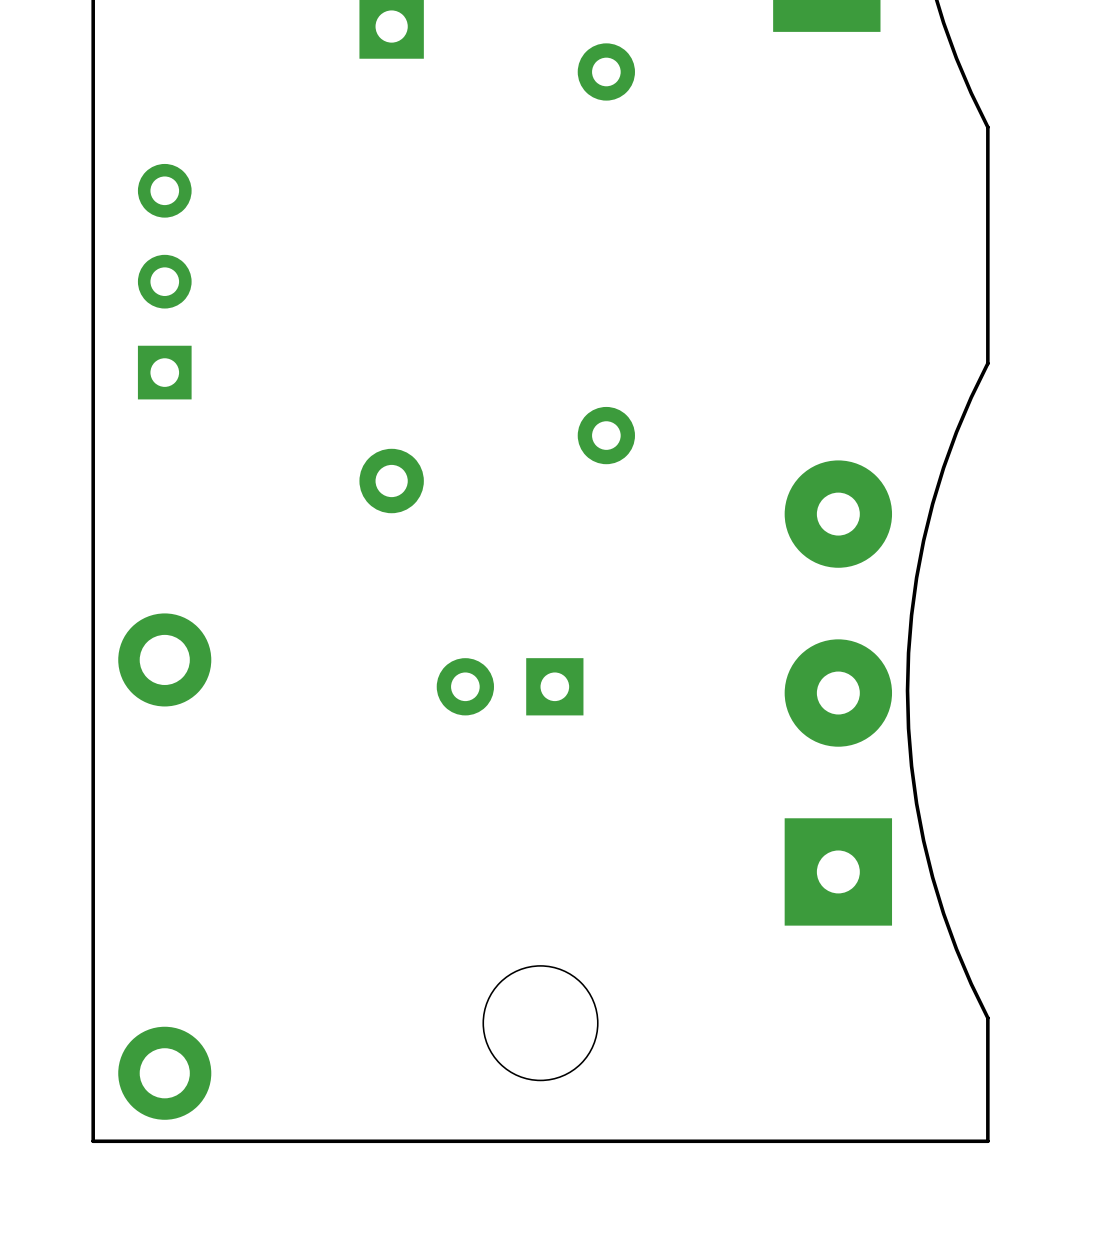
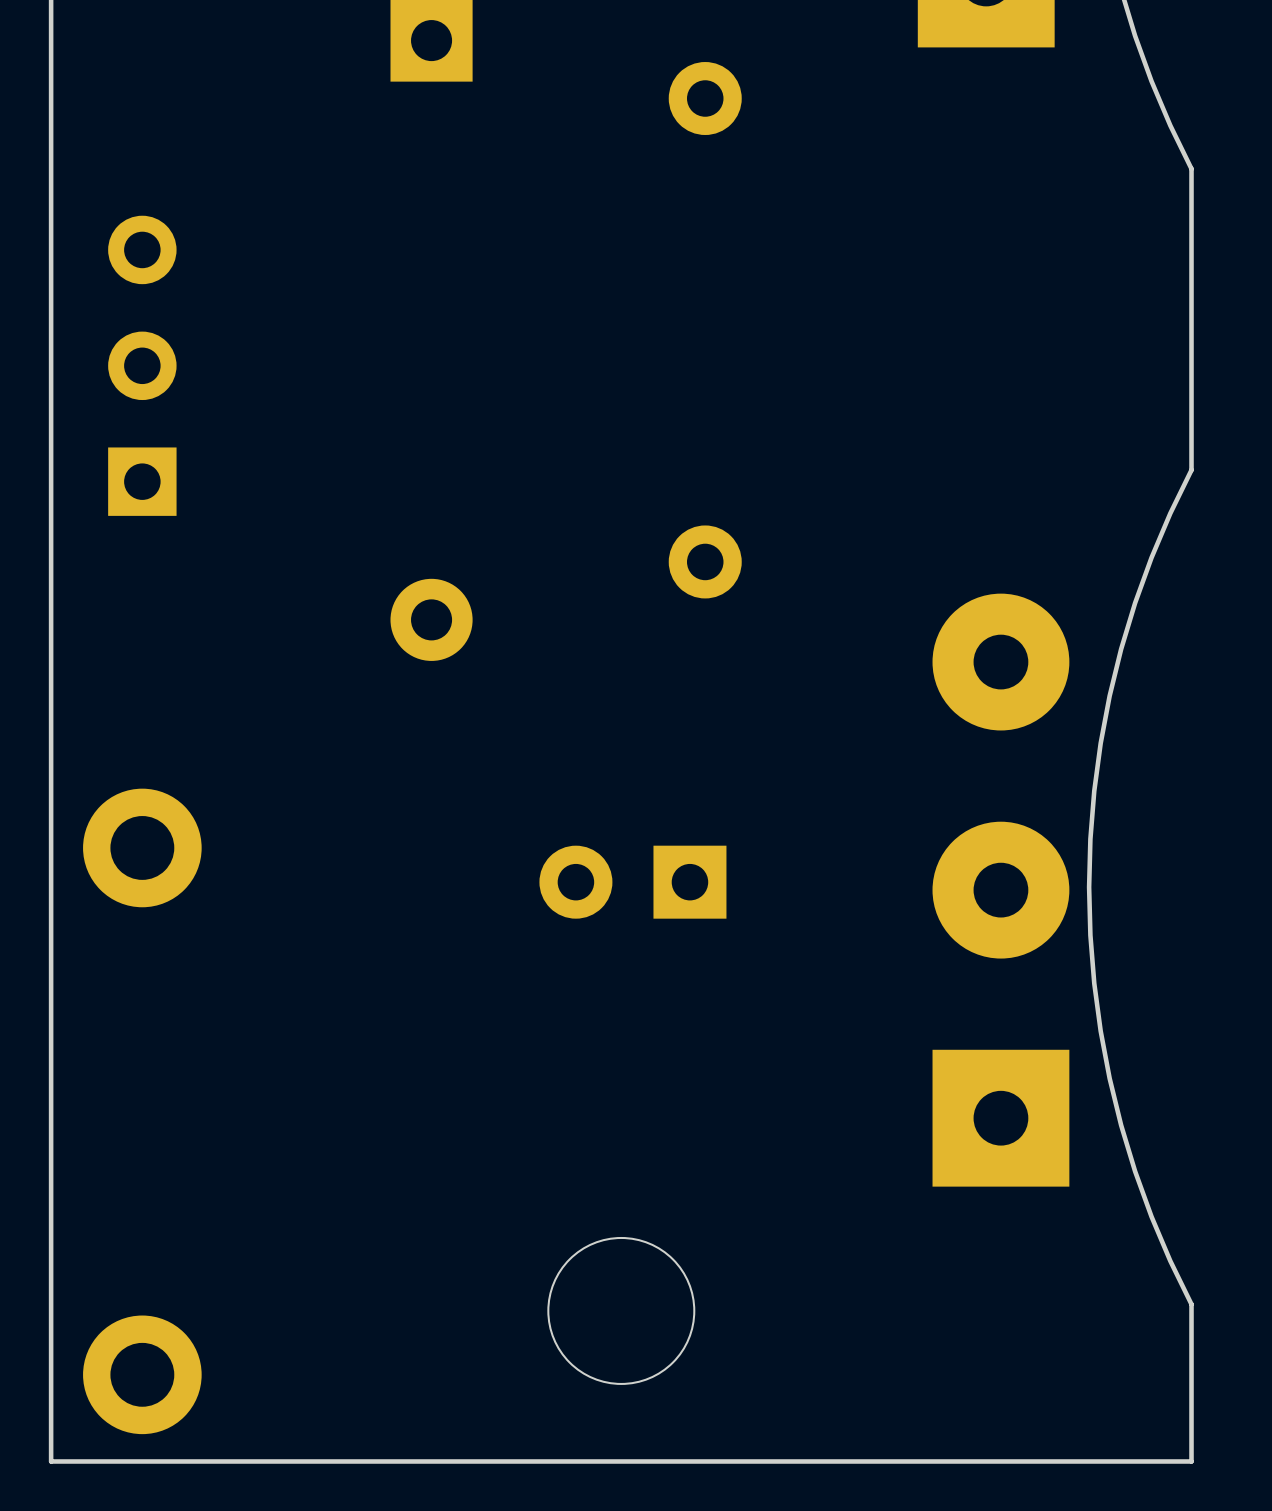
part position: (510, 686) -> (632, 882)

